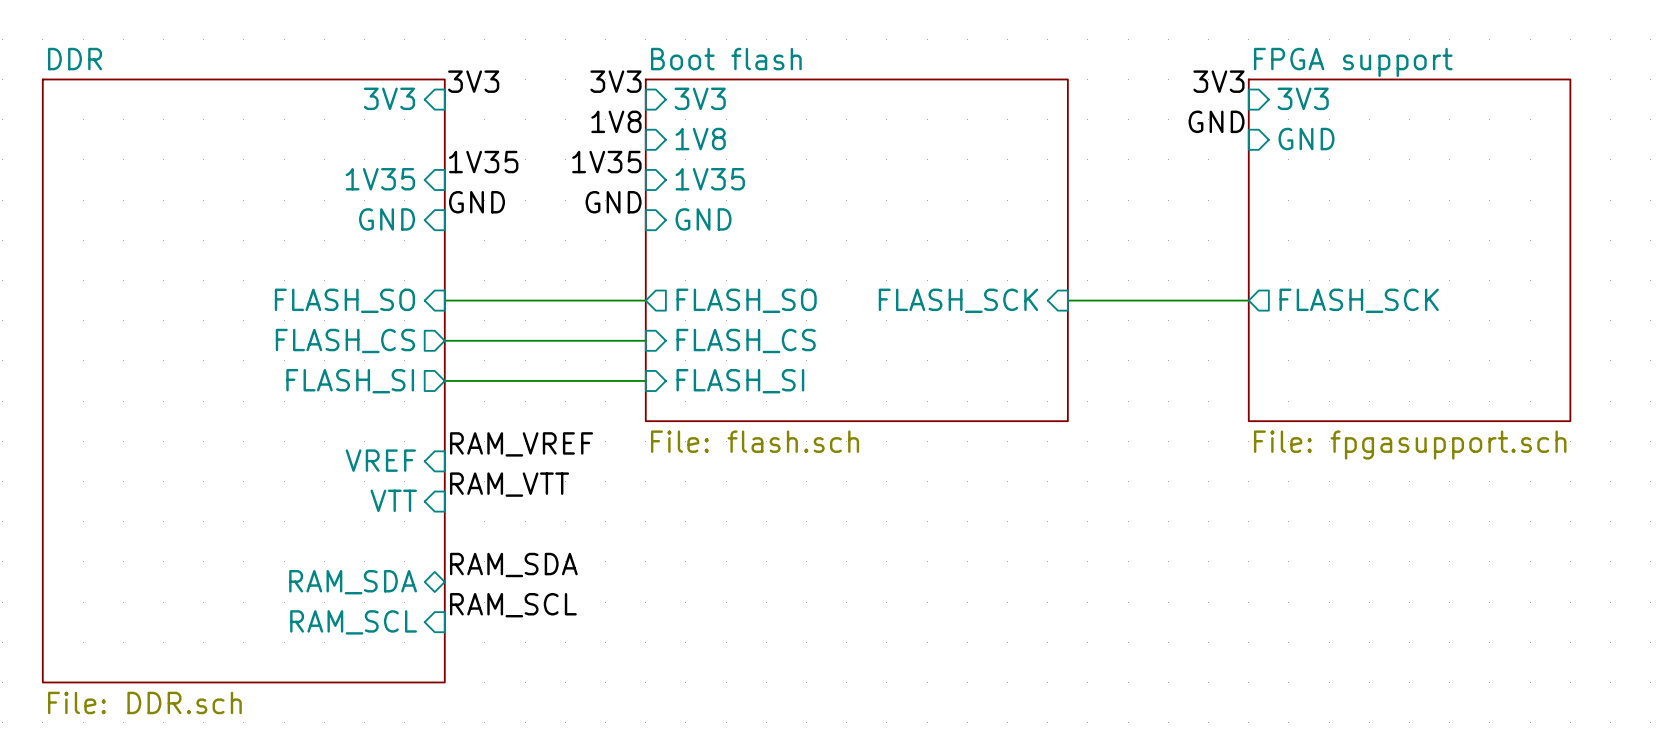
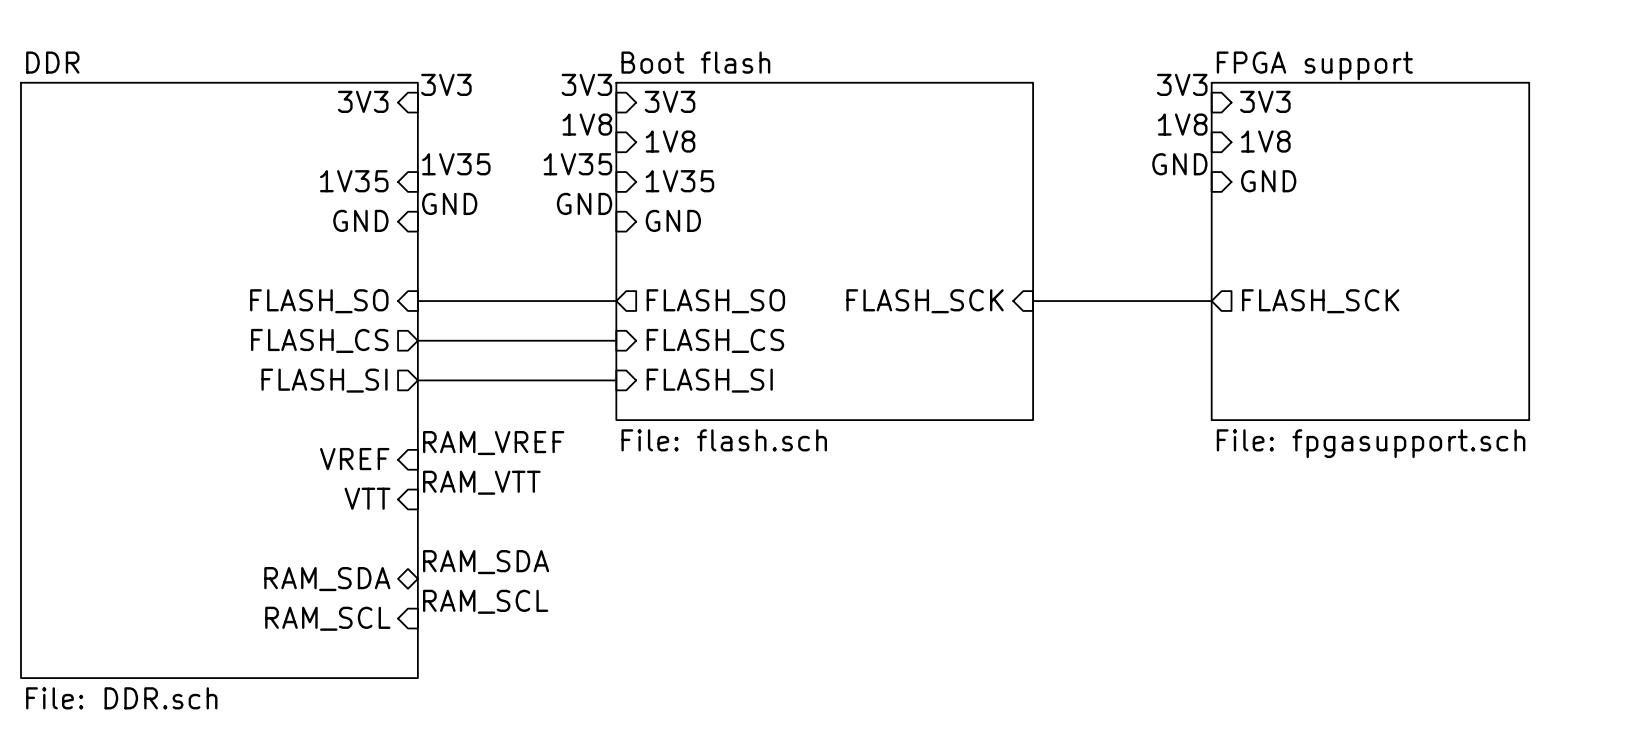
label: GND (1216, 121) -> 1V8 (1182, 124)
sheet pin: GND (1306, 139) -> 1V8 (1265, 141)
label: none -> GND (1179, 164)
sheet pin: none -> GND (1268, 181)

